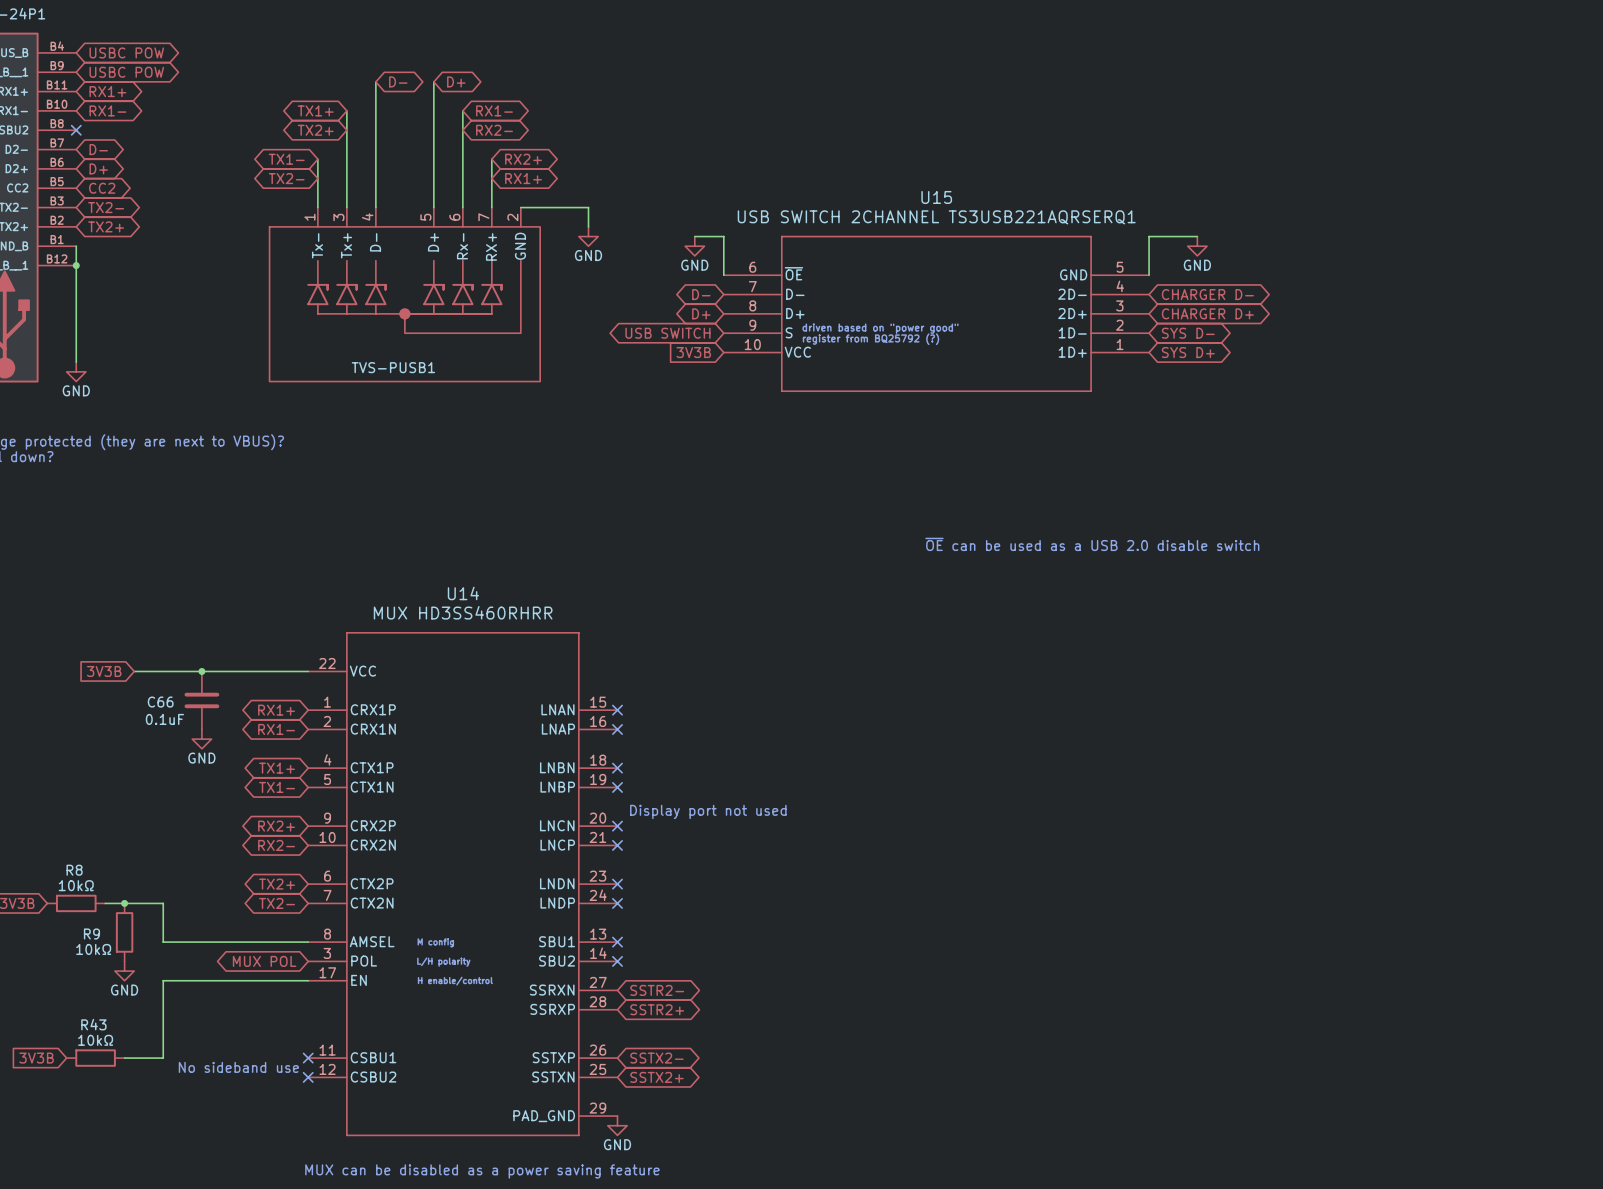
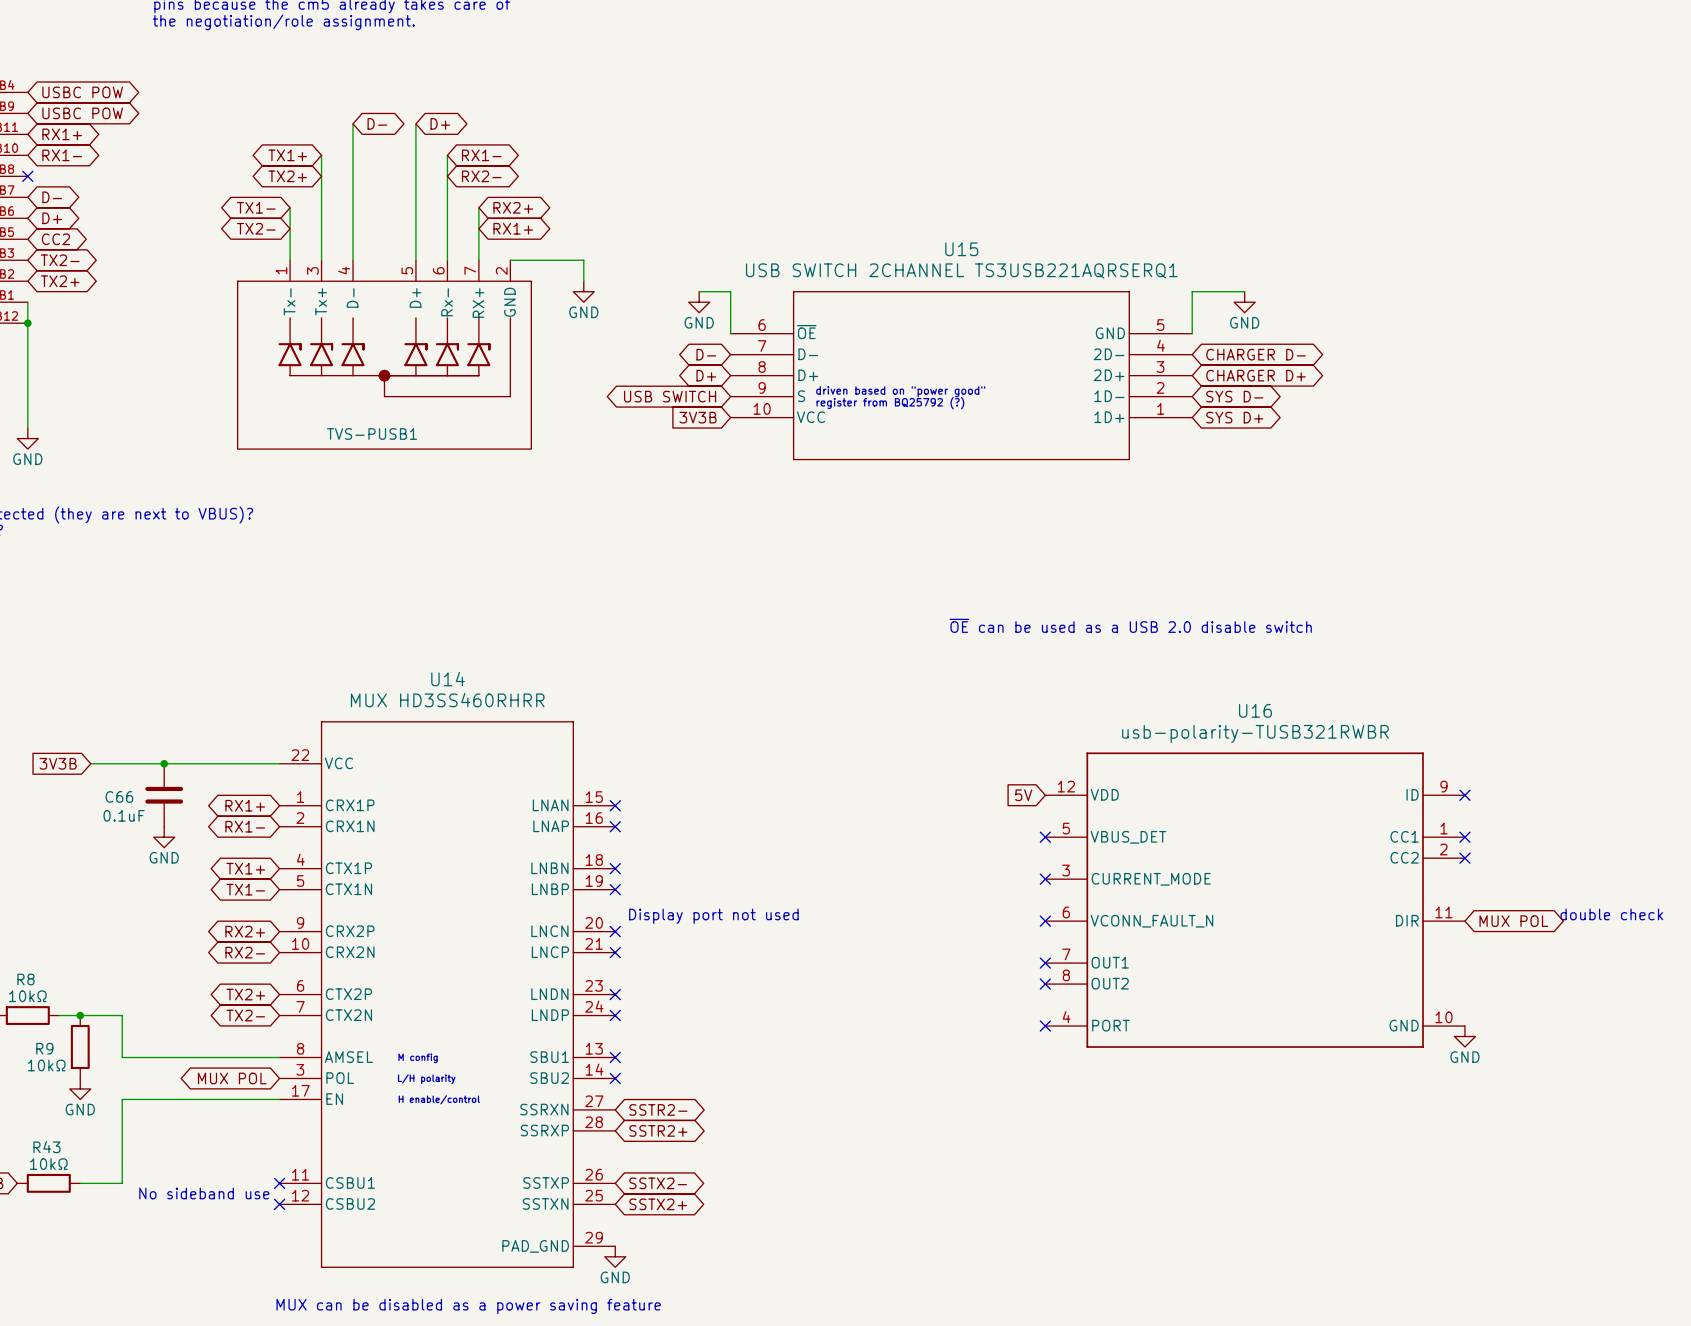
global label: none -> 5V (1023, 795)
no-connect mark: none -> (1464, 795)
no-connect mark: none -> (1045, 837)
no-connect mark: none -> (1464, 837)
no-connect mark: none -> (1464, 858)
no-connect mark: none -> (1045, 879)
U16: none -> usb-polarity-TUSB321RWBR (1255, 900)
text: none -> double check (1611, 914)
no-connect mark: none -> (1045, 921)
global label: none -> MUX POL (1513, 921)
no-connect mark: none -> (1045, 963)
no-connect mark: none -> (1045, 984)
no-connect mark: none -> (1045, 1026)
power symbol: none -> GND (1464, 1036)

